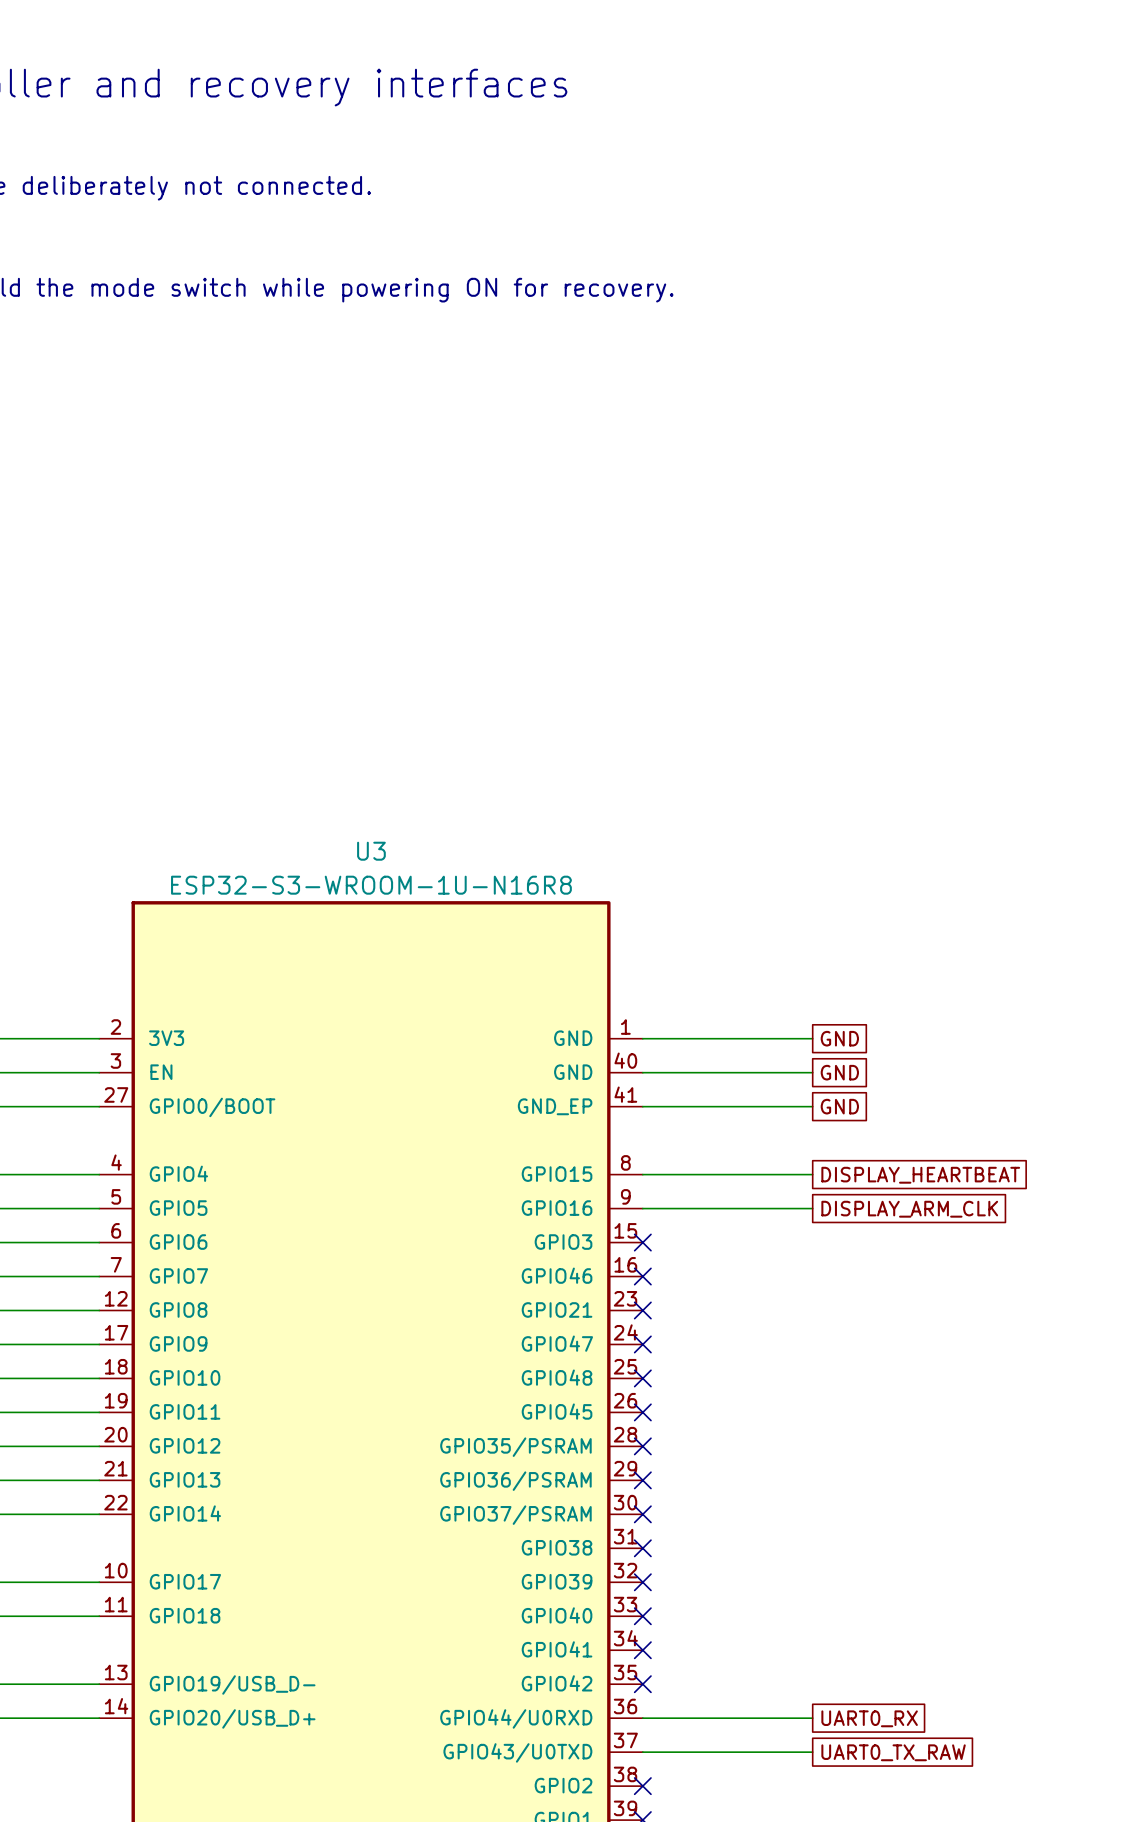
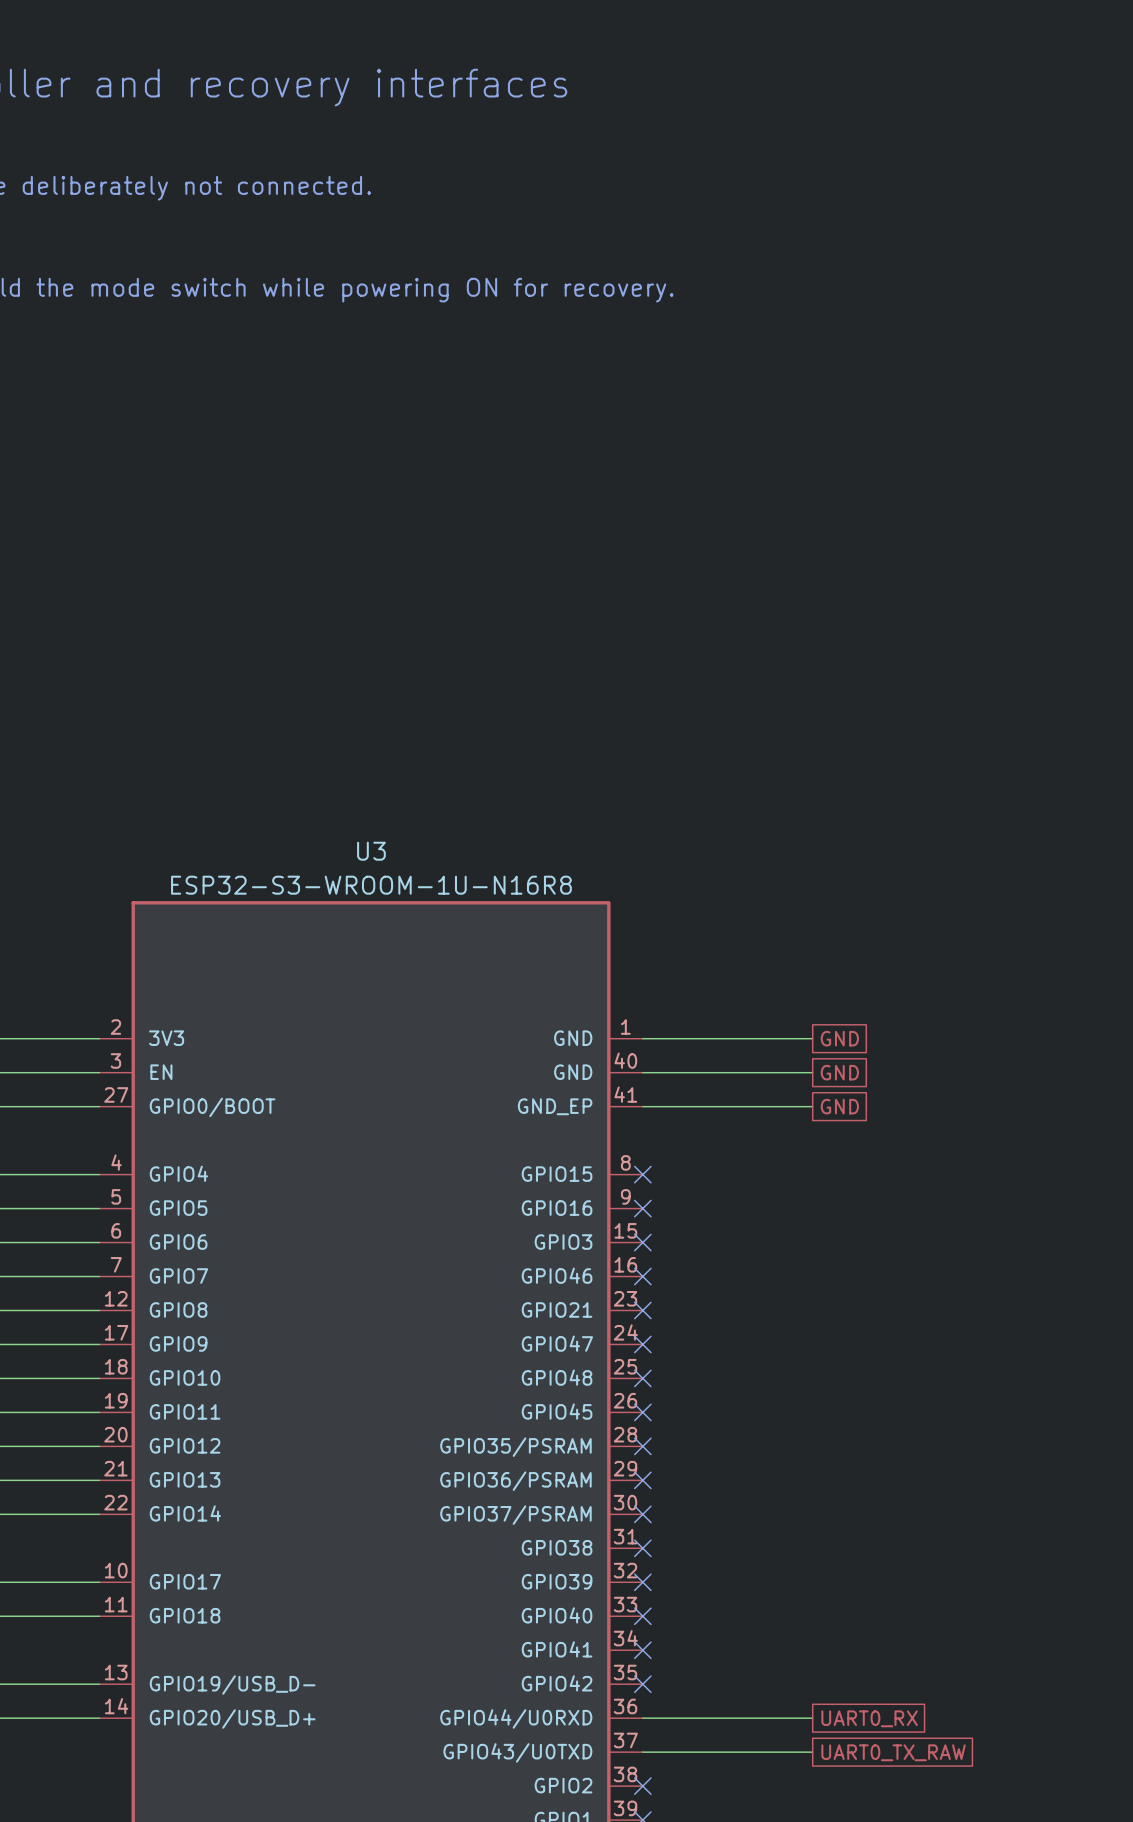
wire: (642, 1174) (812, 1174) -> none
no-connect mark: none -> (642, 1174)
global label: DISPLAY_HEARTBEAT (920, 1175) -> none
wire: (642, 1208) (812, 1208) -> none
no-connect mark: none -> (642, 1208)
global label: DISPLAY_ARM_CLK (909, 1209) -> none

